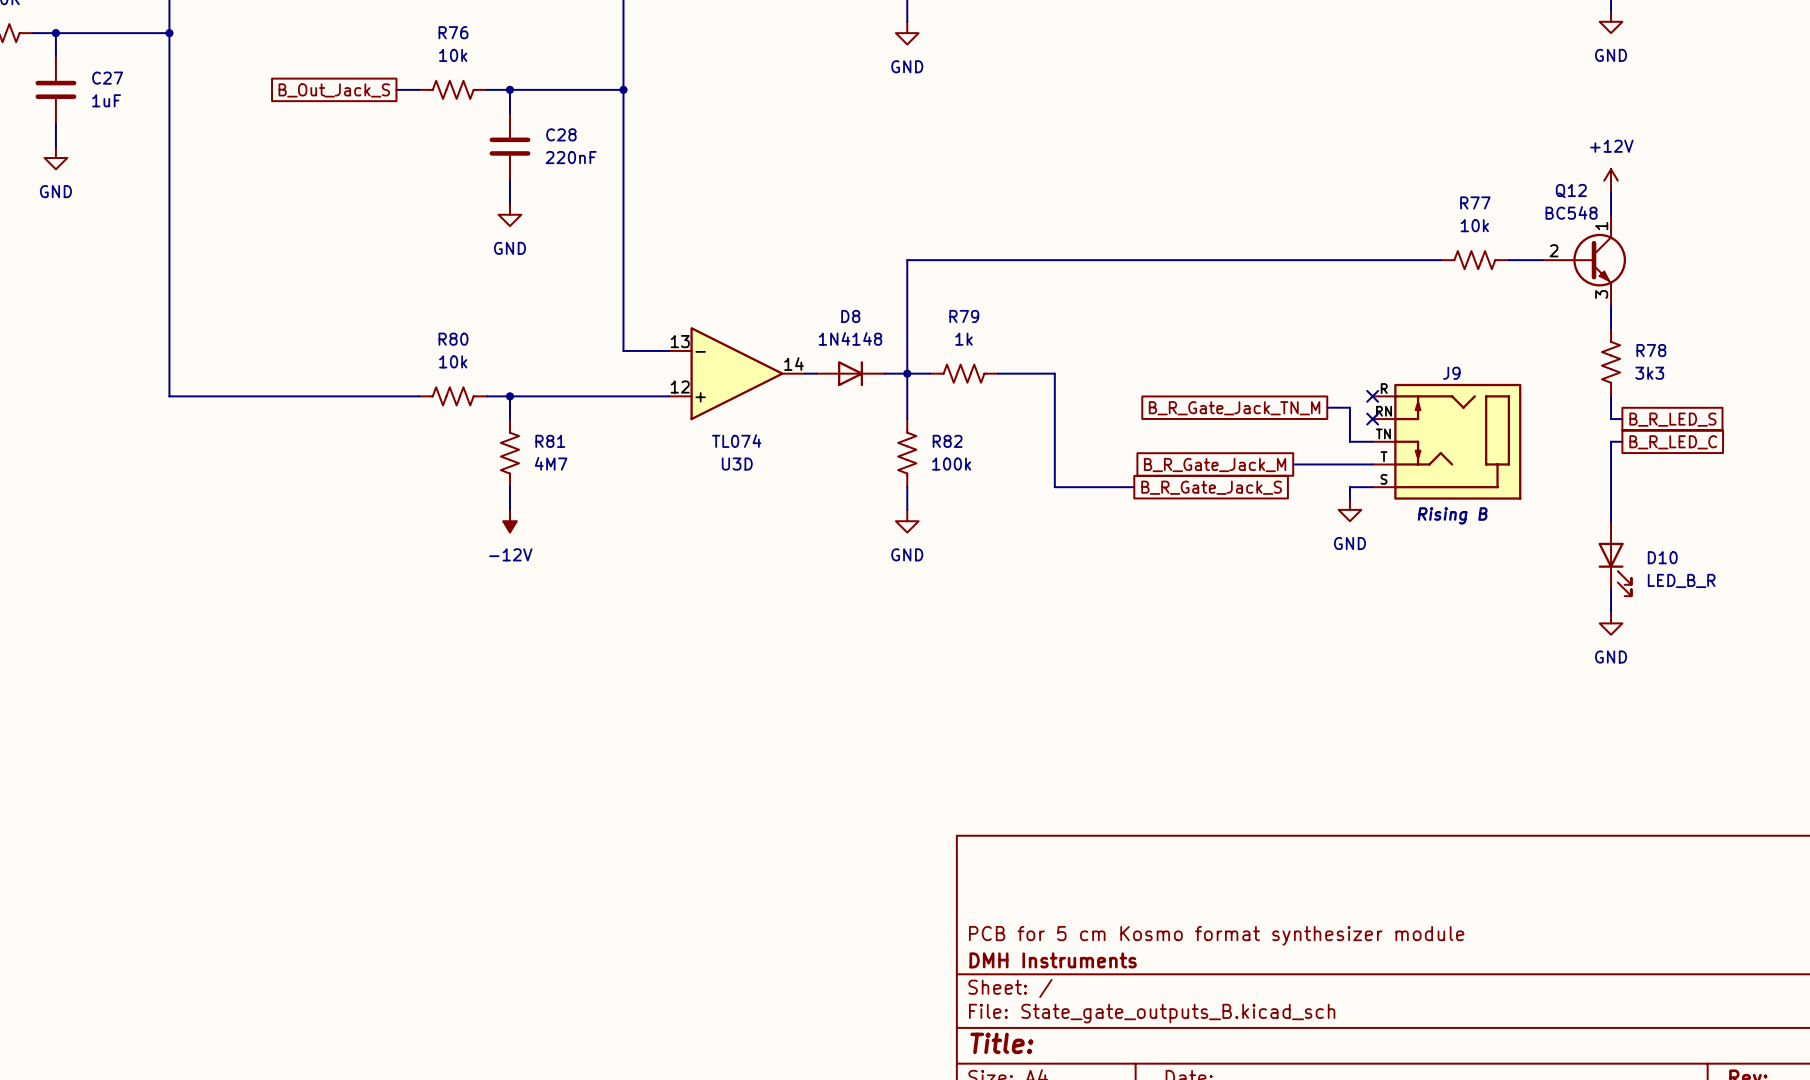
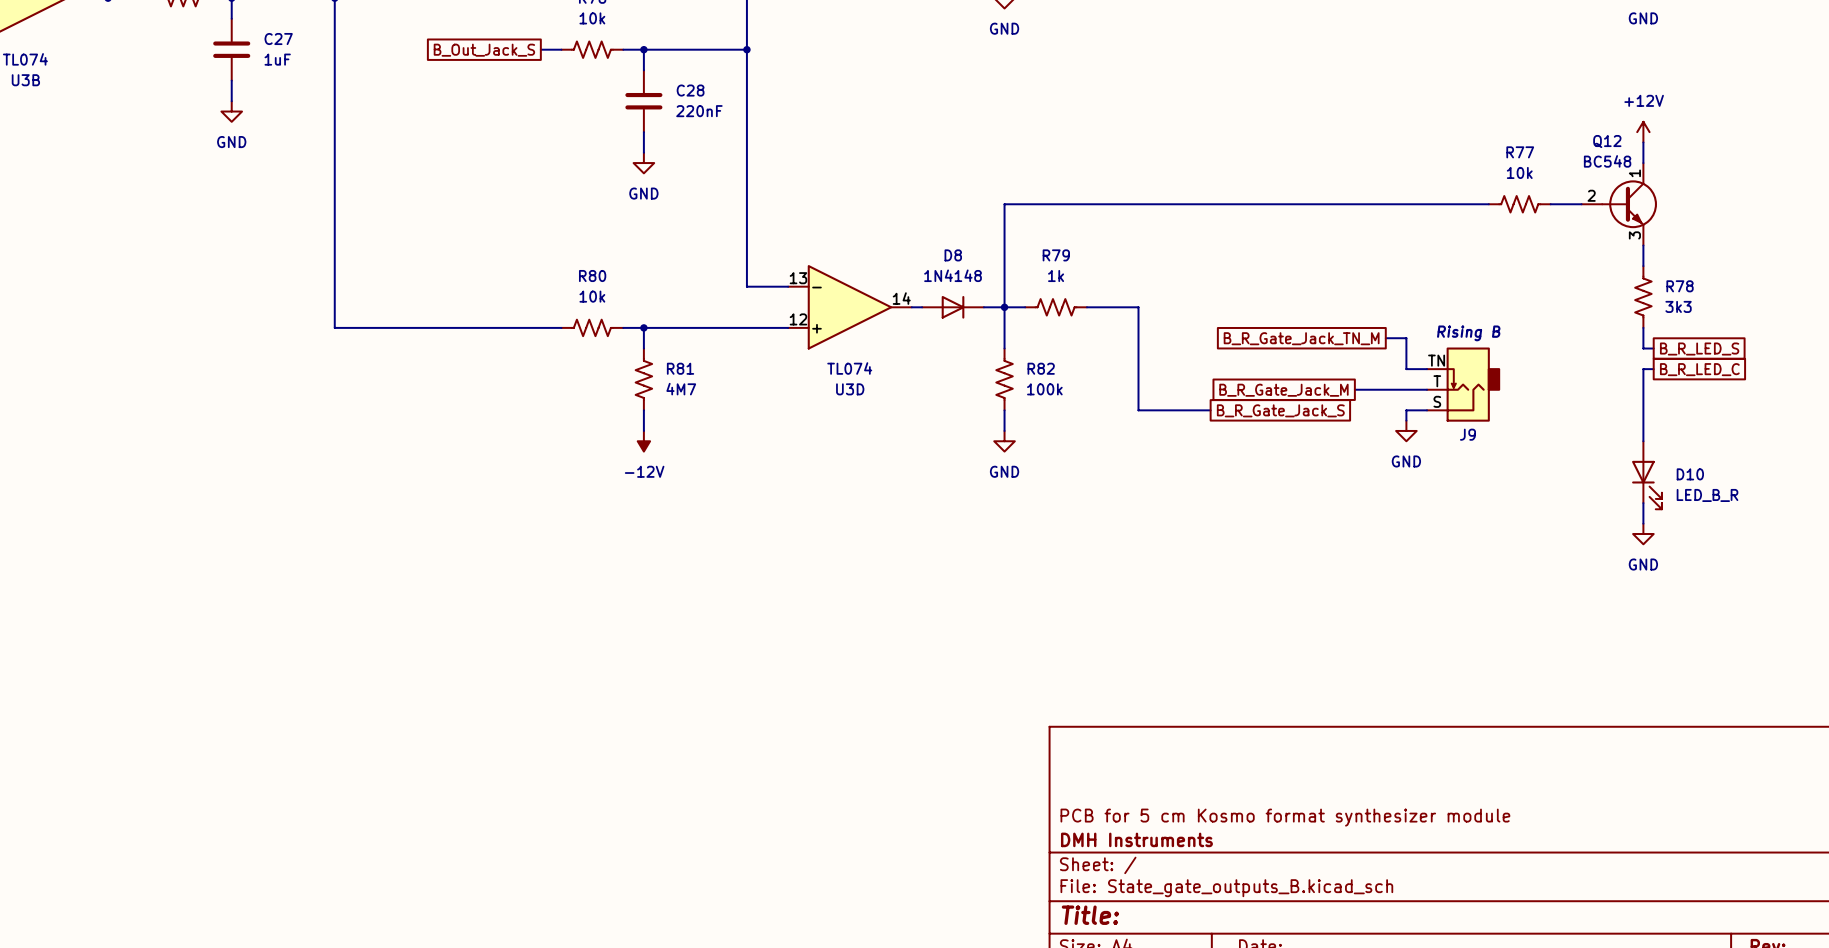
J9 name position: J9 (1451, 373) -> J9 (1467, 434)
J9 symbol: [1372, 383, 1522, 500] -> [1427, 347, 1501, 422]
no-connect mark: (1372, 396) -> none
no-connect mark: (1372, 419) -> none
J9 text position: Rising B (1452, 515) -> Rising B (1468, 333)

